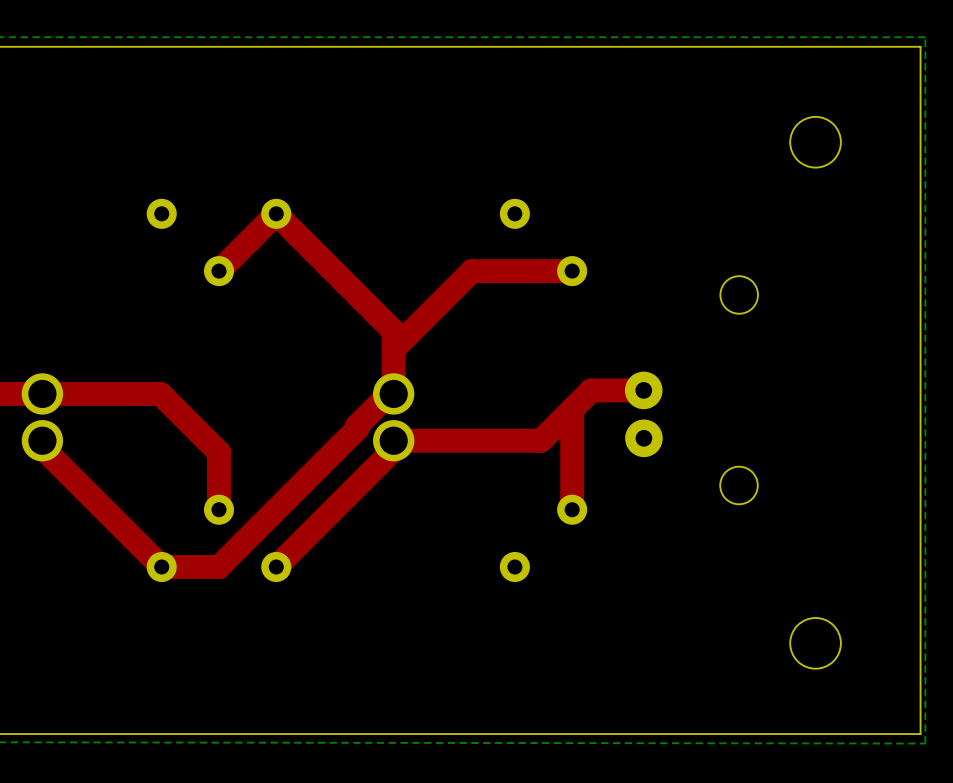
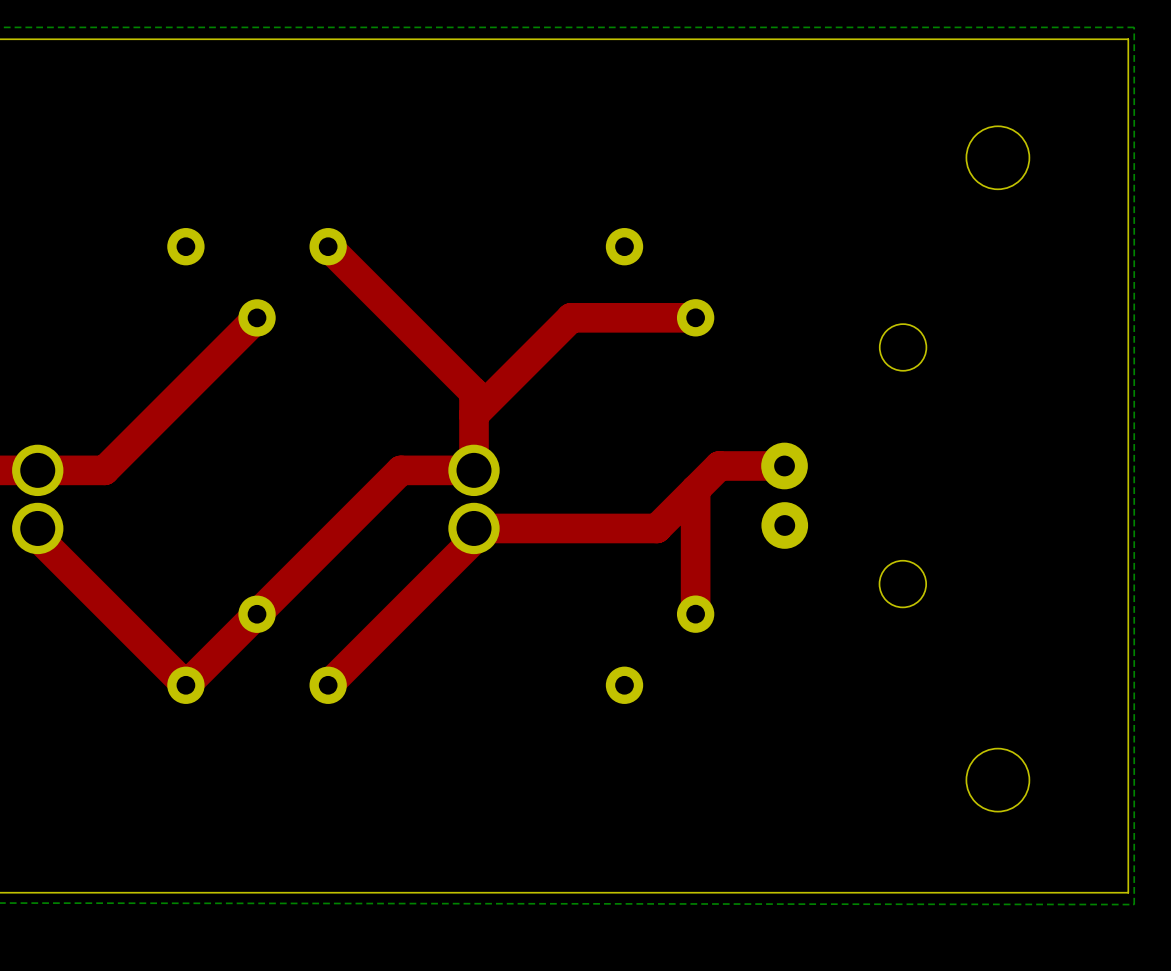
top track: (276, 213) (219, 271) -> none
top track: (96, 393) (160, 393) (219, 452) (219, 509) -> (104, 470) (257, 317)
top track: (389, 393) (357, 425) (357, 428) (219, 566) (161, 566) -> (468, 470) (400, 470) (186, 685)

